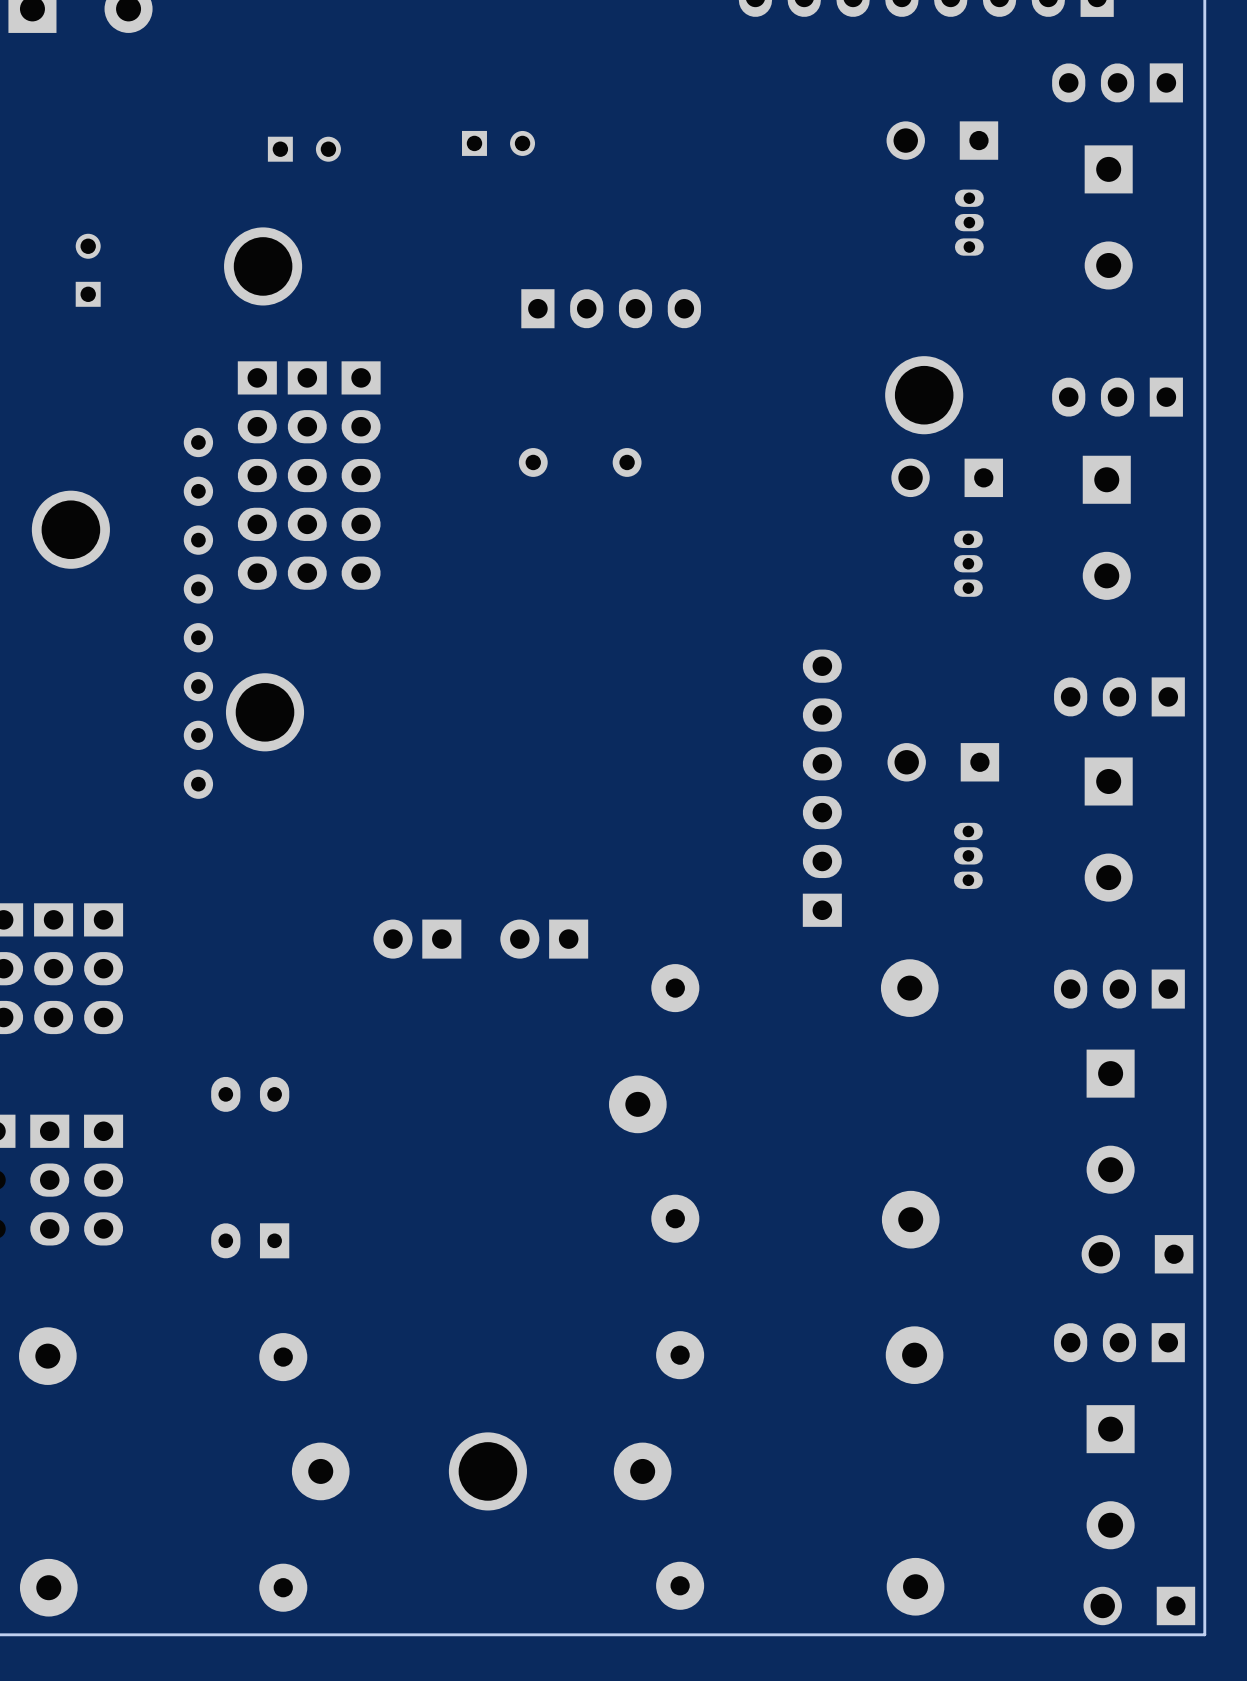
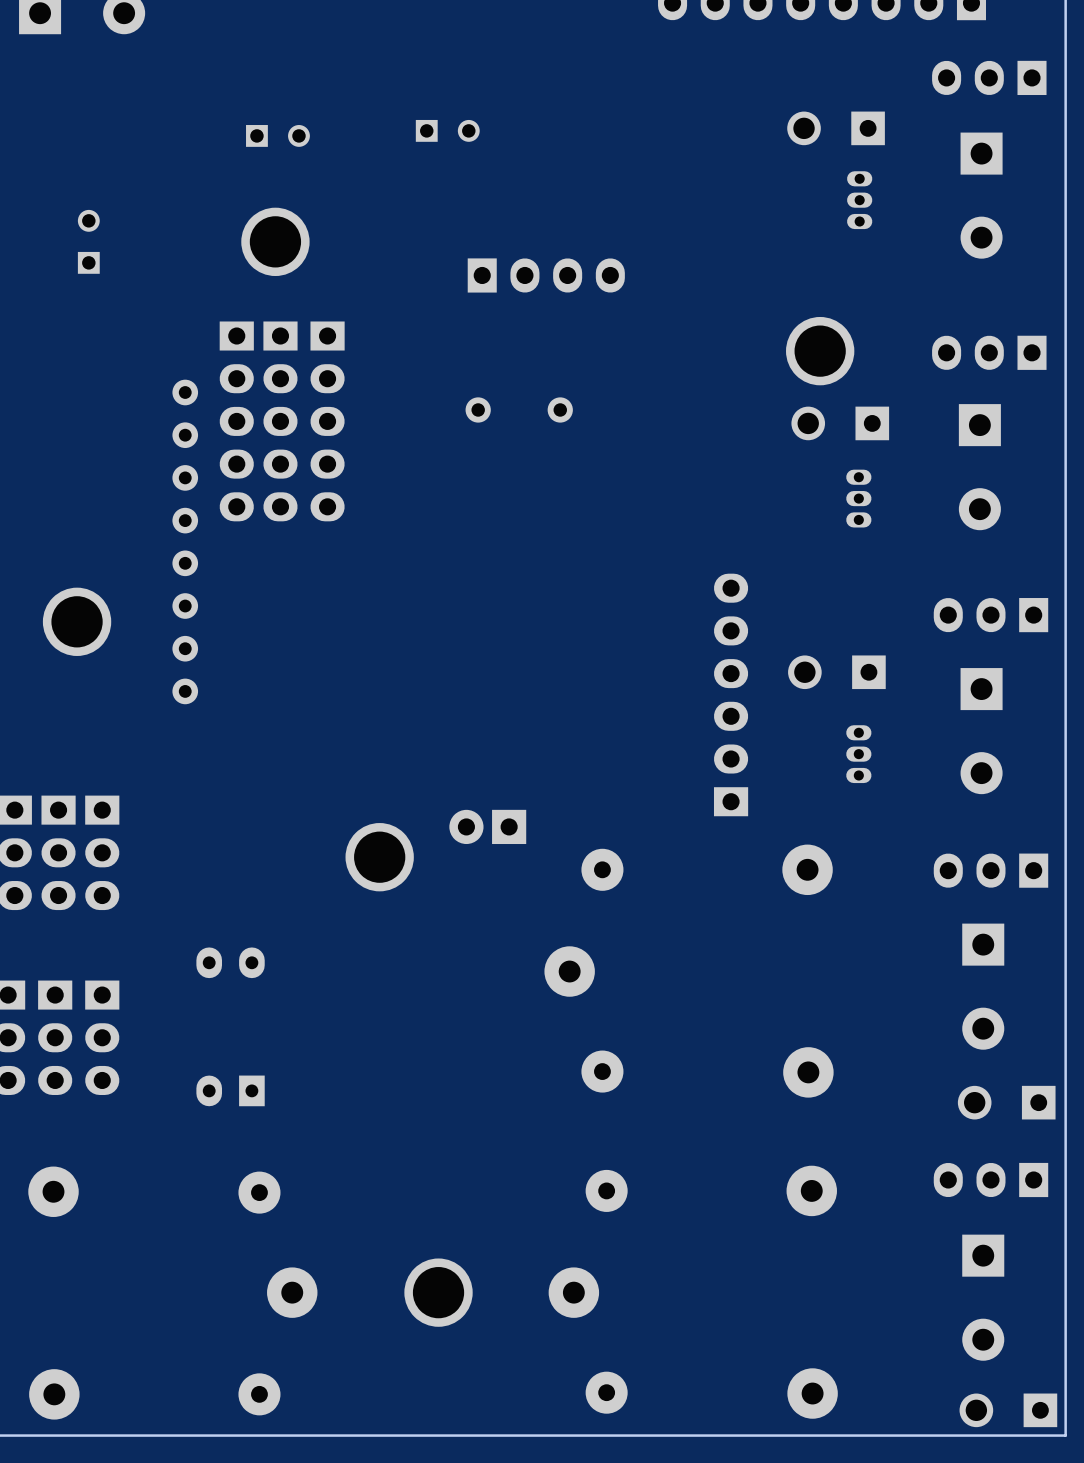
part position: (263, 266) -> (275, 241)
part: (70, 529) -> none
part: none -> (77, 621)
part: (265, 712) -> none
part: (417, 939) -> none
part: none -> (379, 857)

